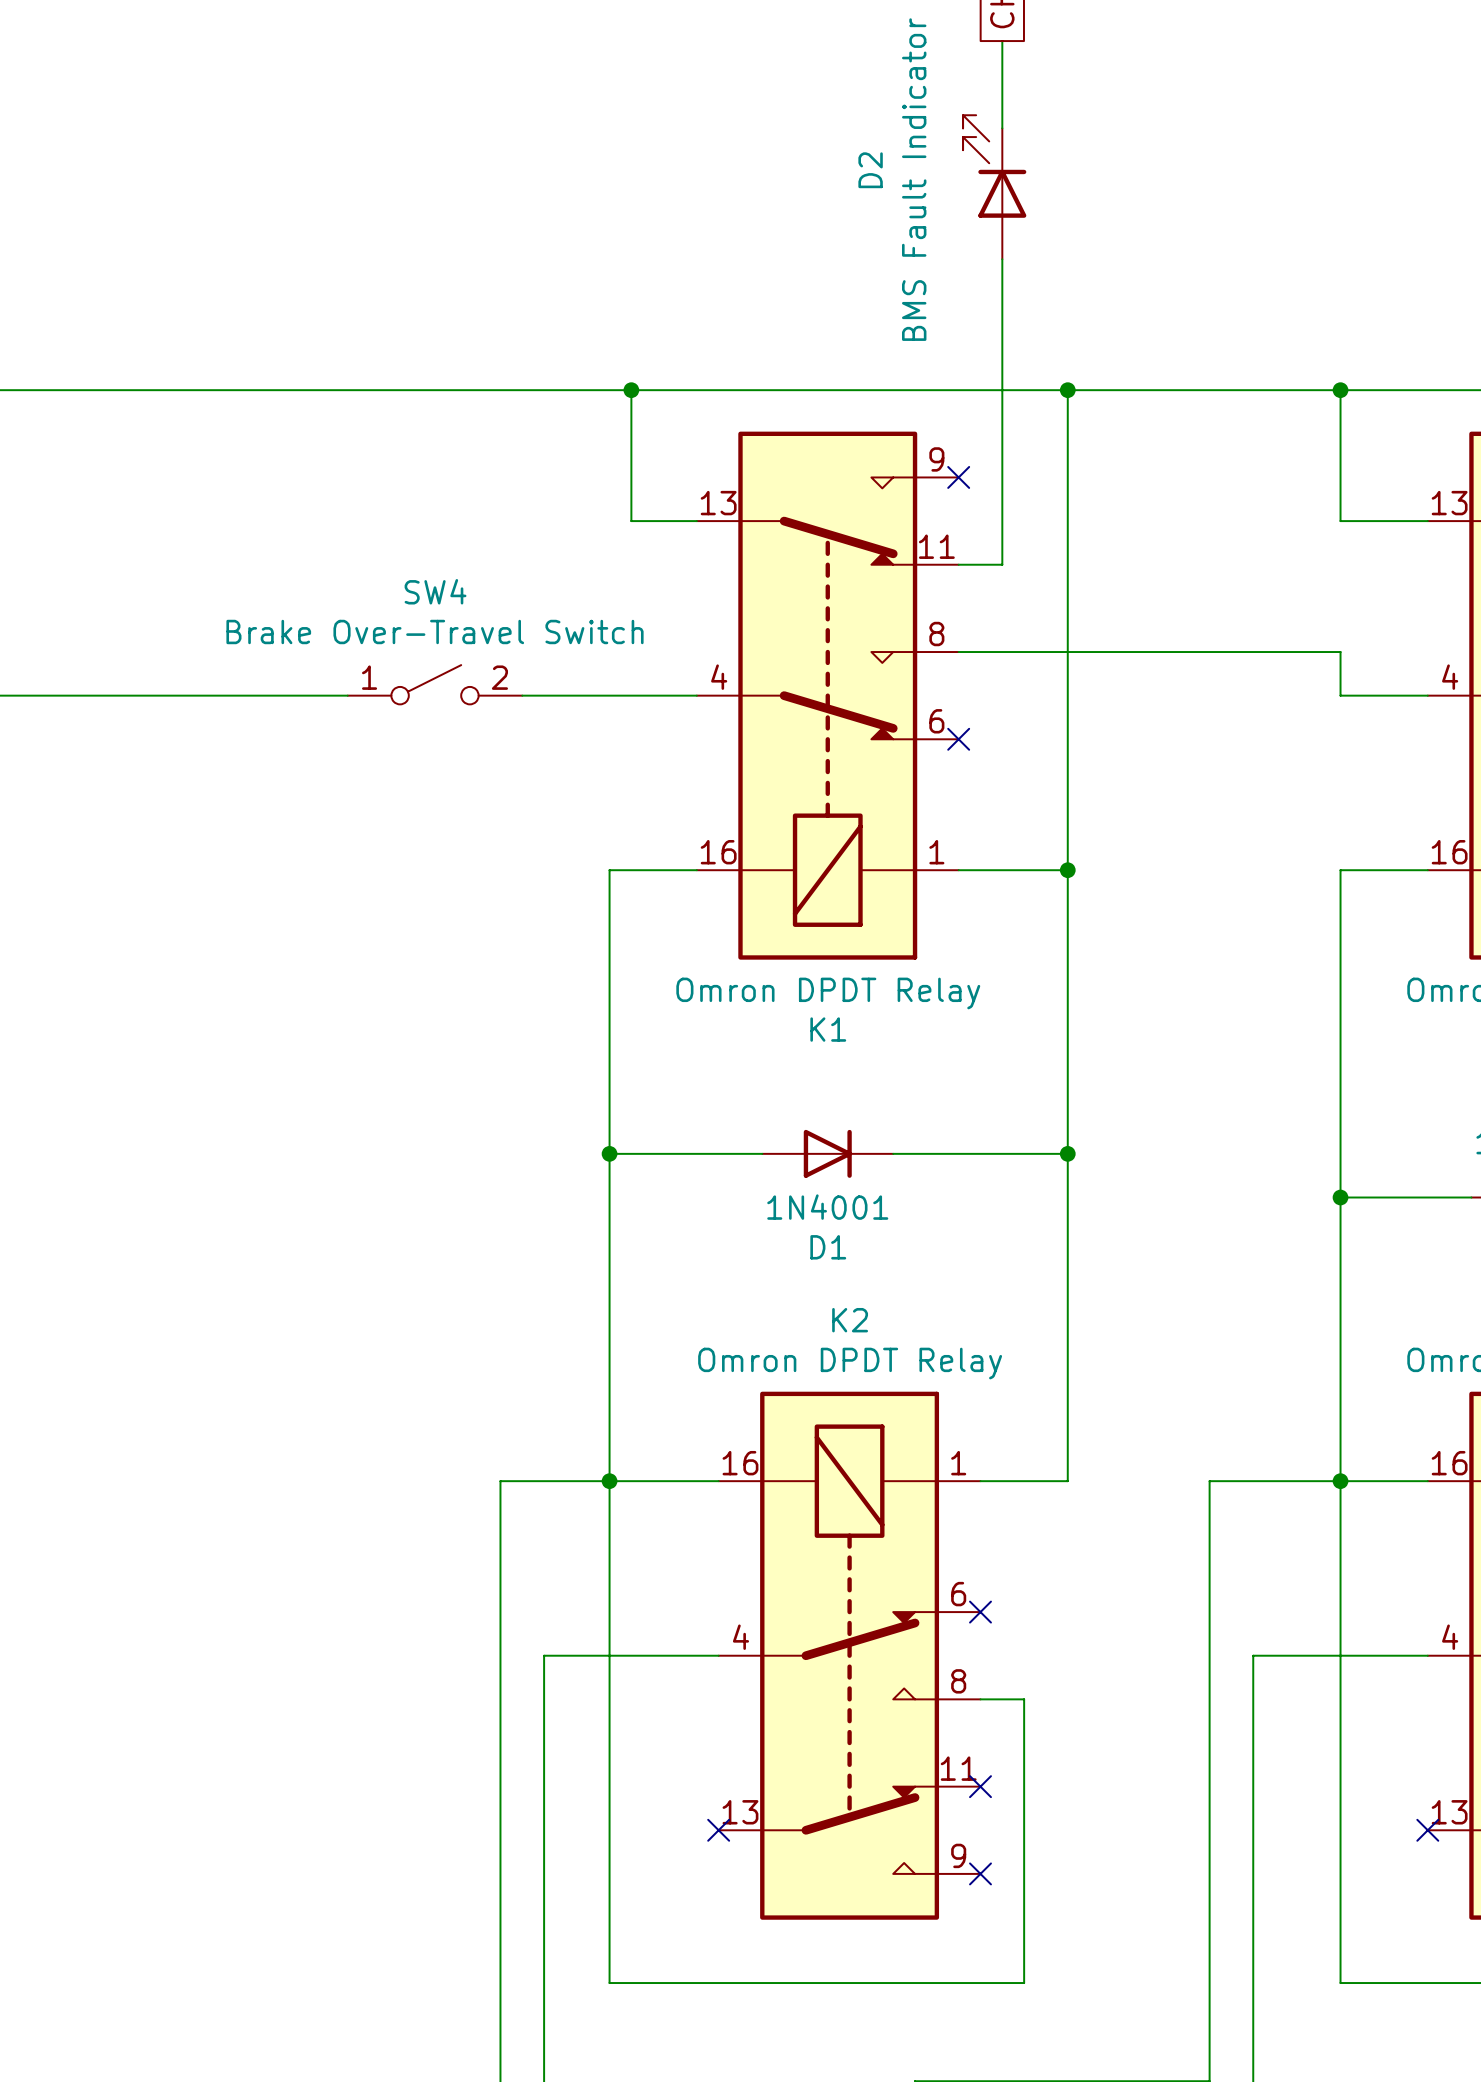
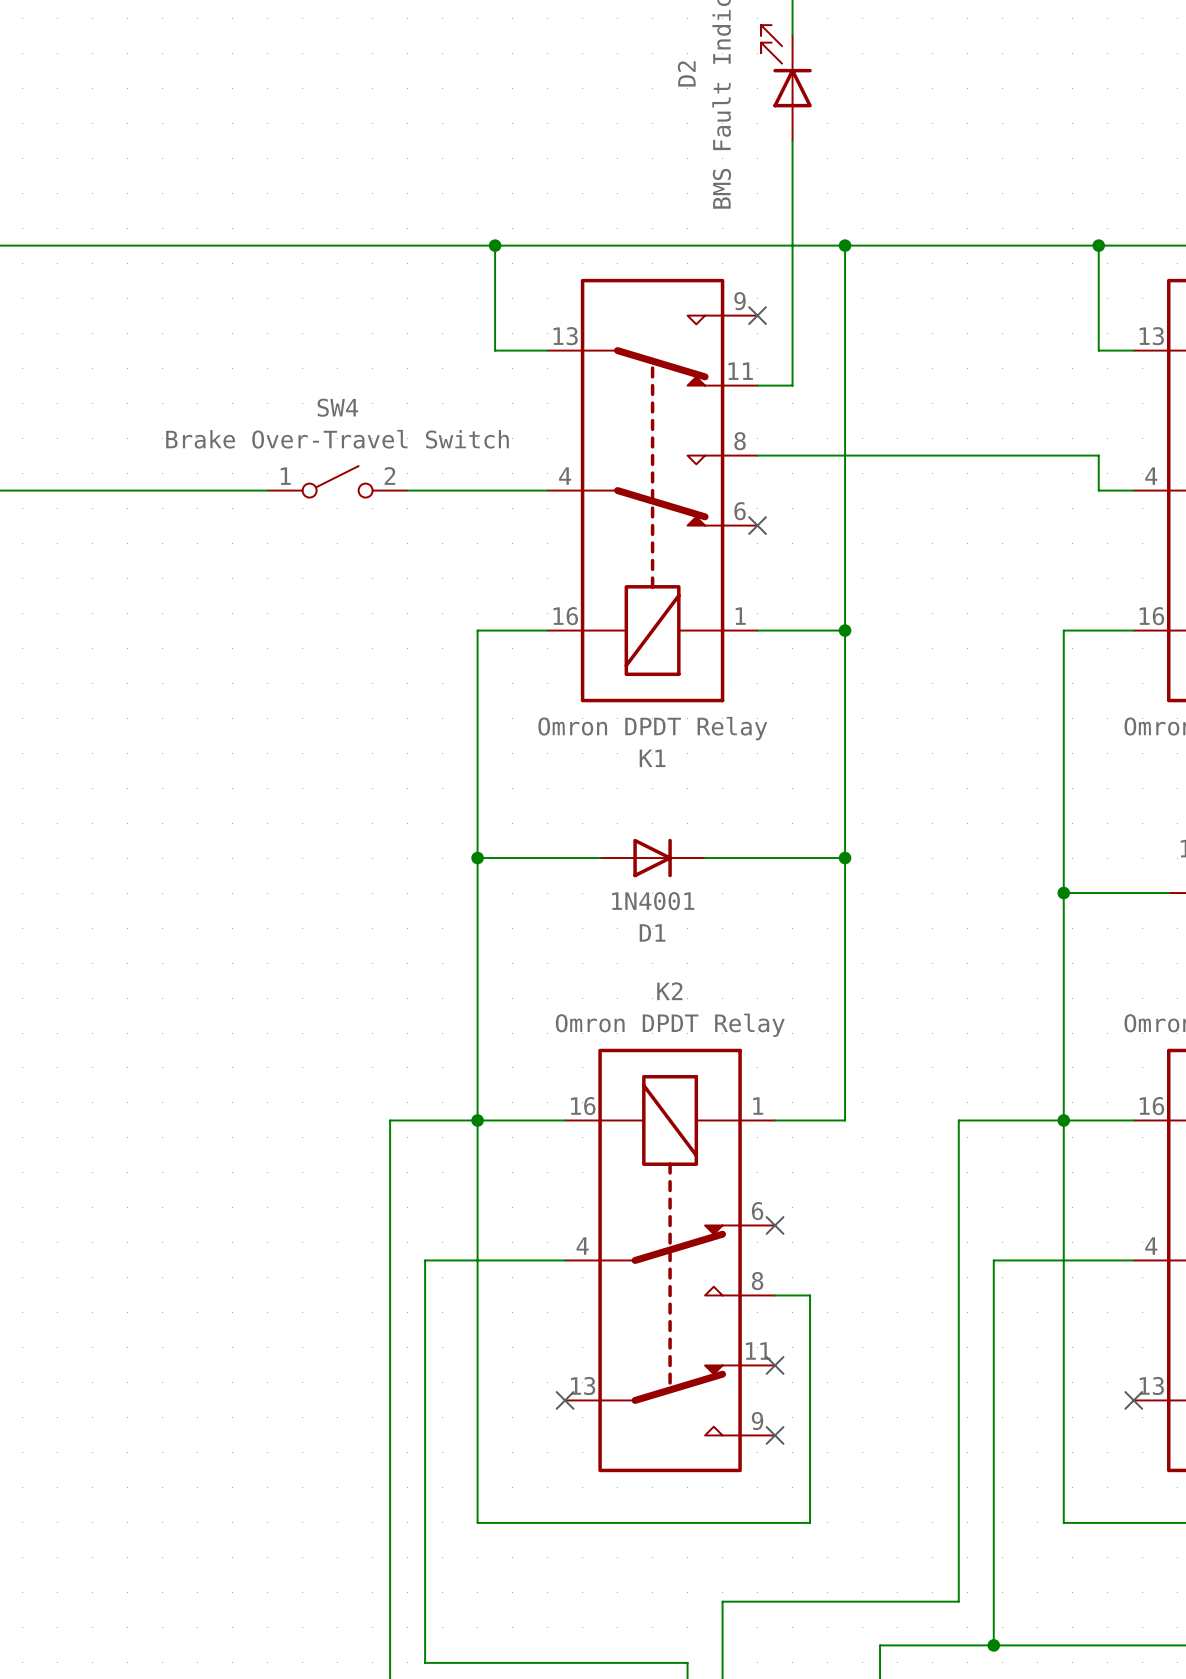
wire: (1340, 390) (1340, 521) (1384, 521) -> (1098, 245) (1098, 350)
junction position: (1340, 390) -> (1098, 245)
wire: (1340, 652) (1340, 695) (1384, 695) -> (1063, 455) (1098, 455) (1098, 490)

